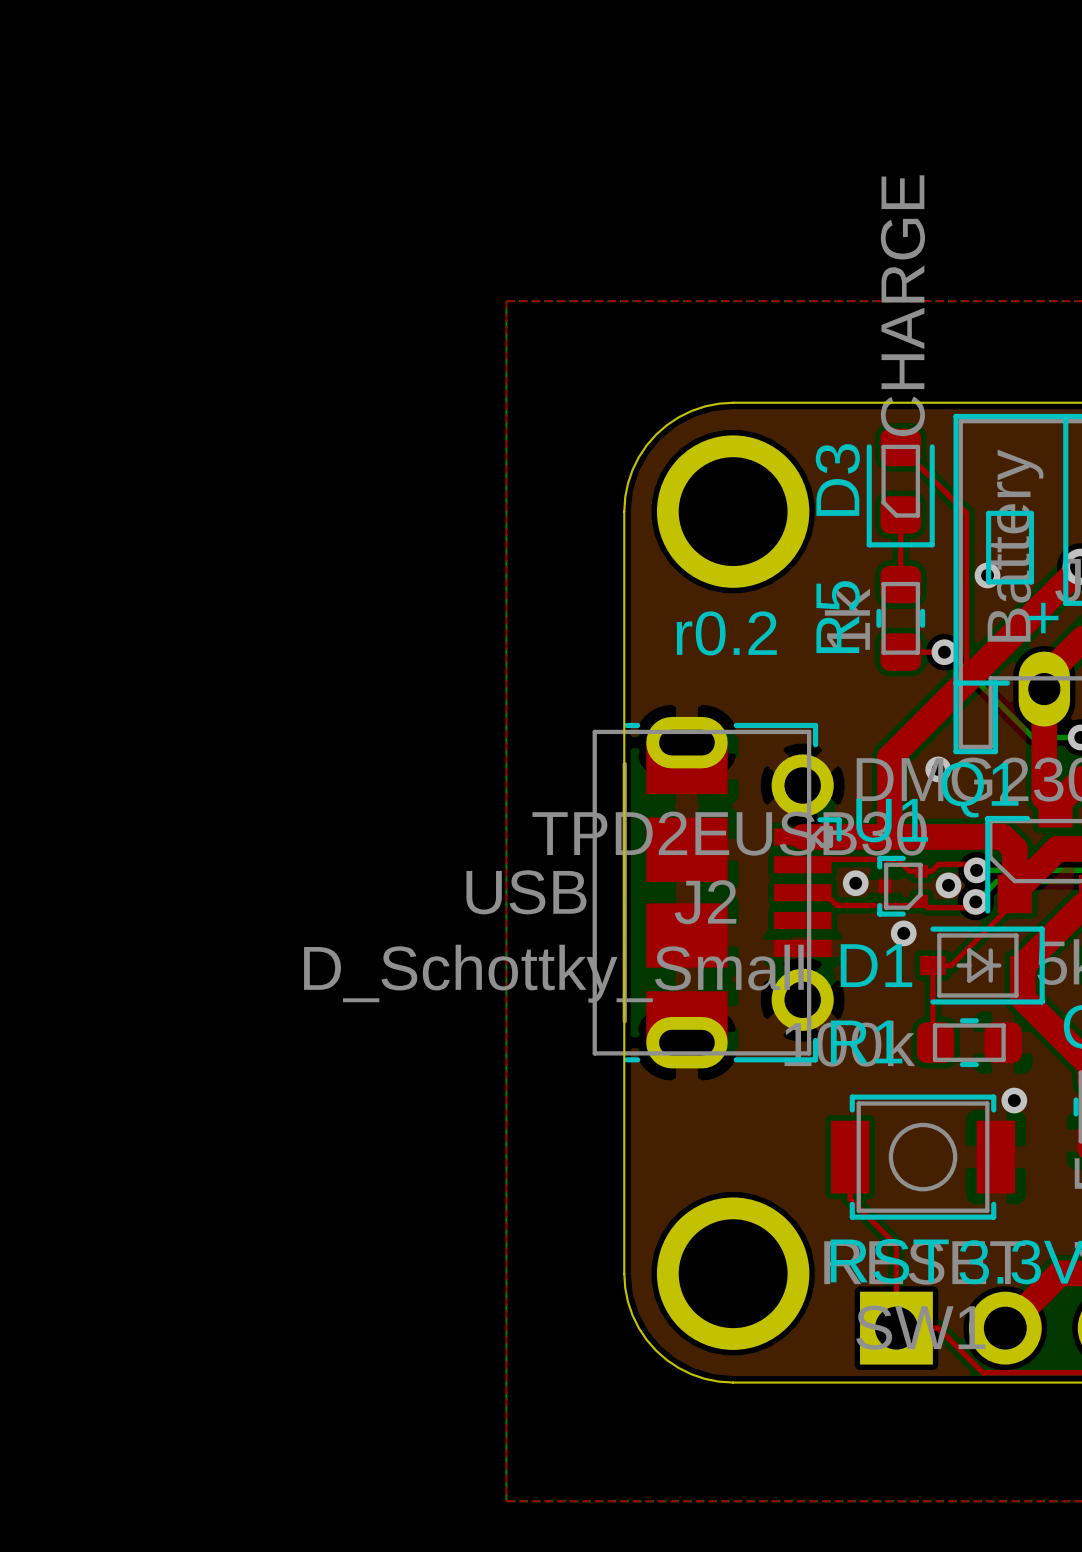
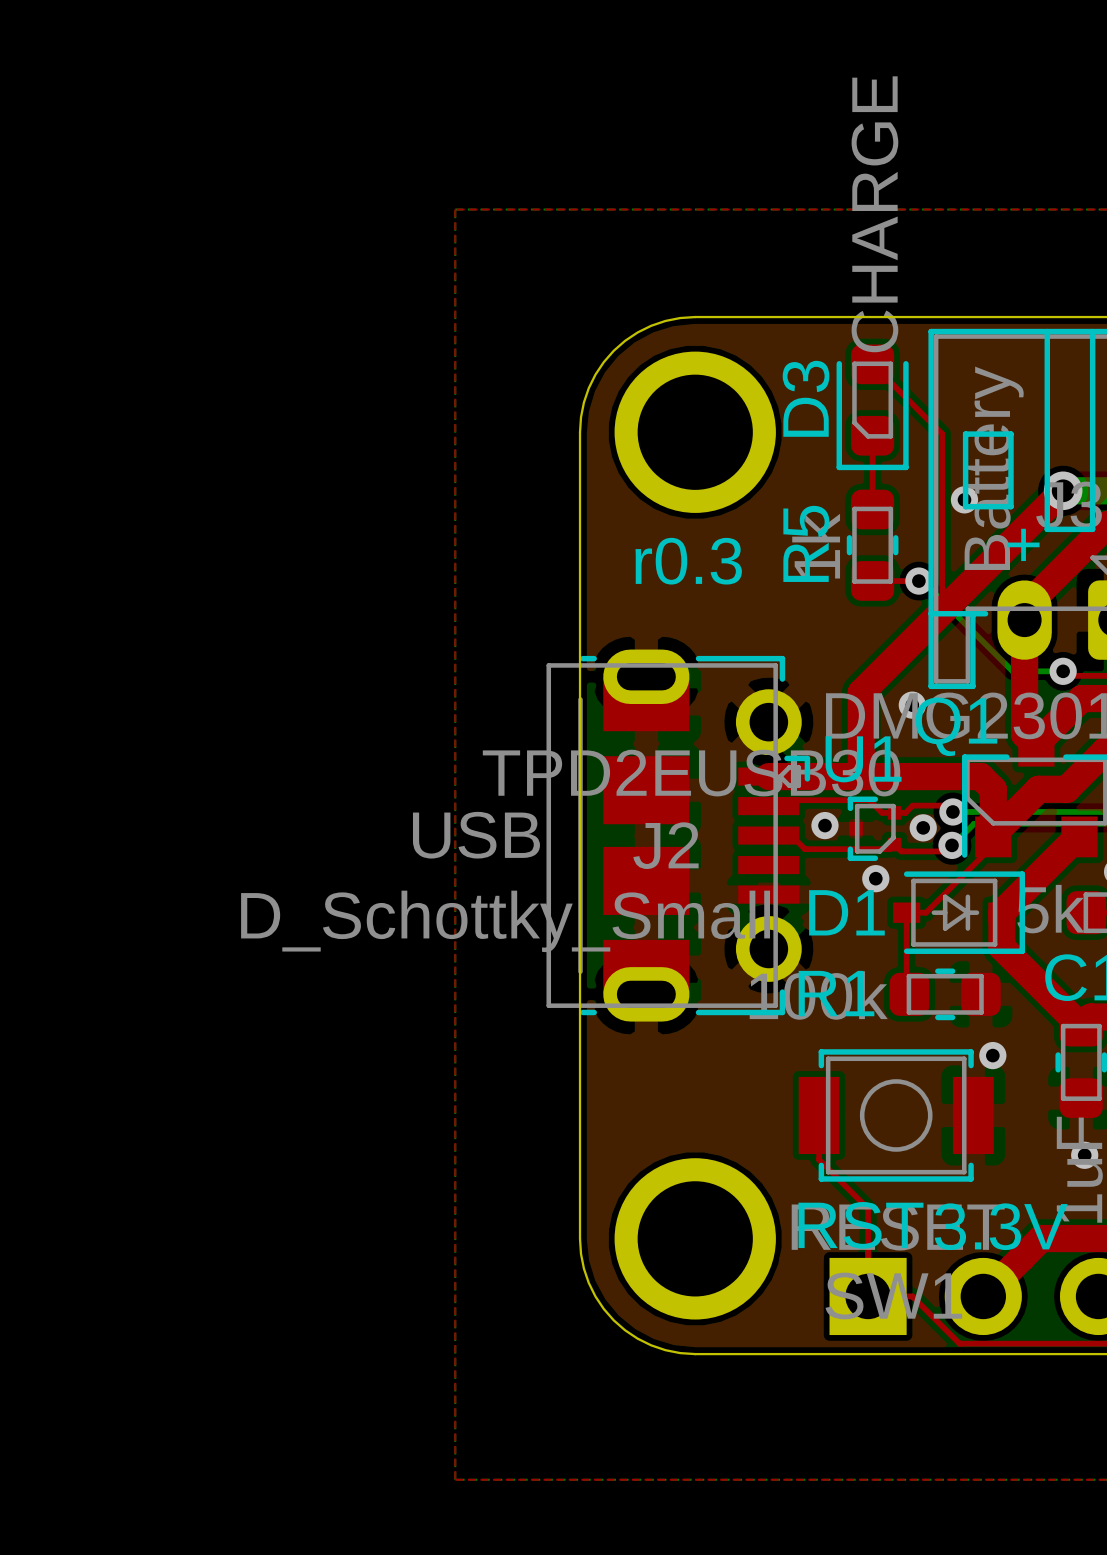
text: r0.2 (726, 633) -> r0.3 (688, 561)

